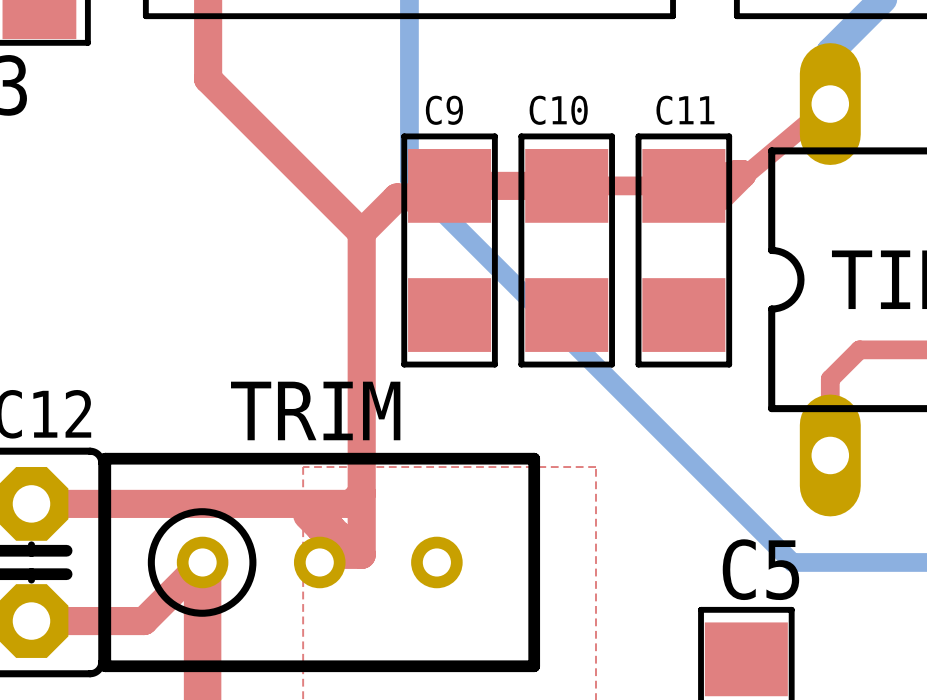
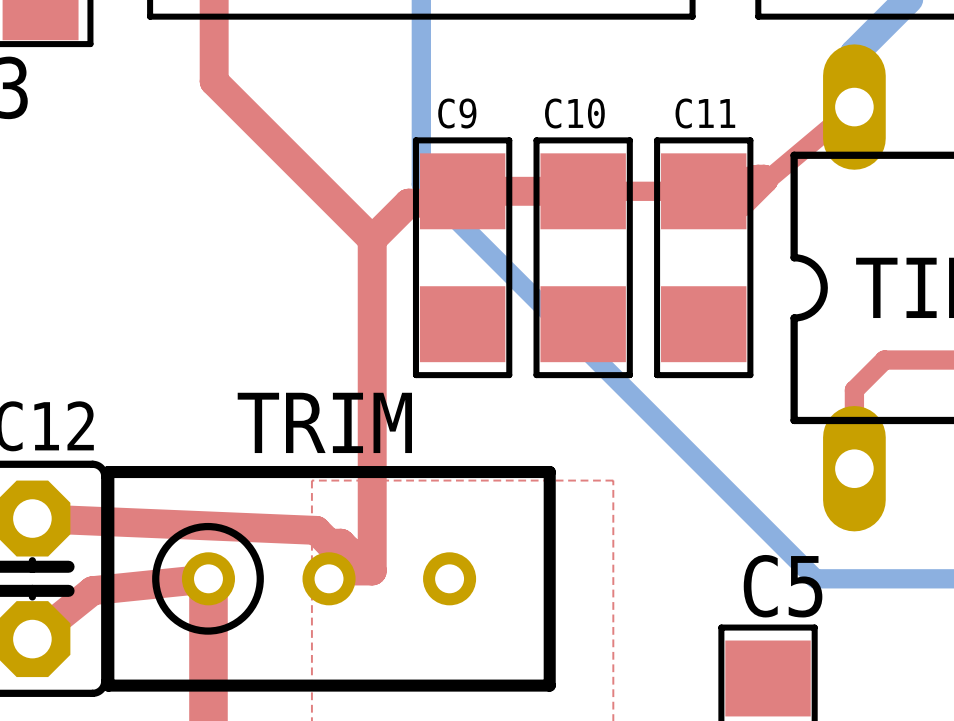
top track: (361, 493) (351, 503) (31, 503) -> (316, 530) (32, 518)
top track: (202, 562) (144, 621) (31, 621) -> (208, 578) (92, 590) (32, 639)

